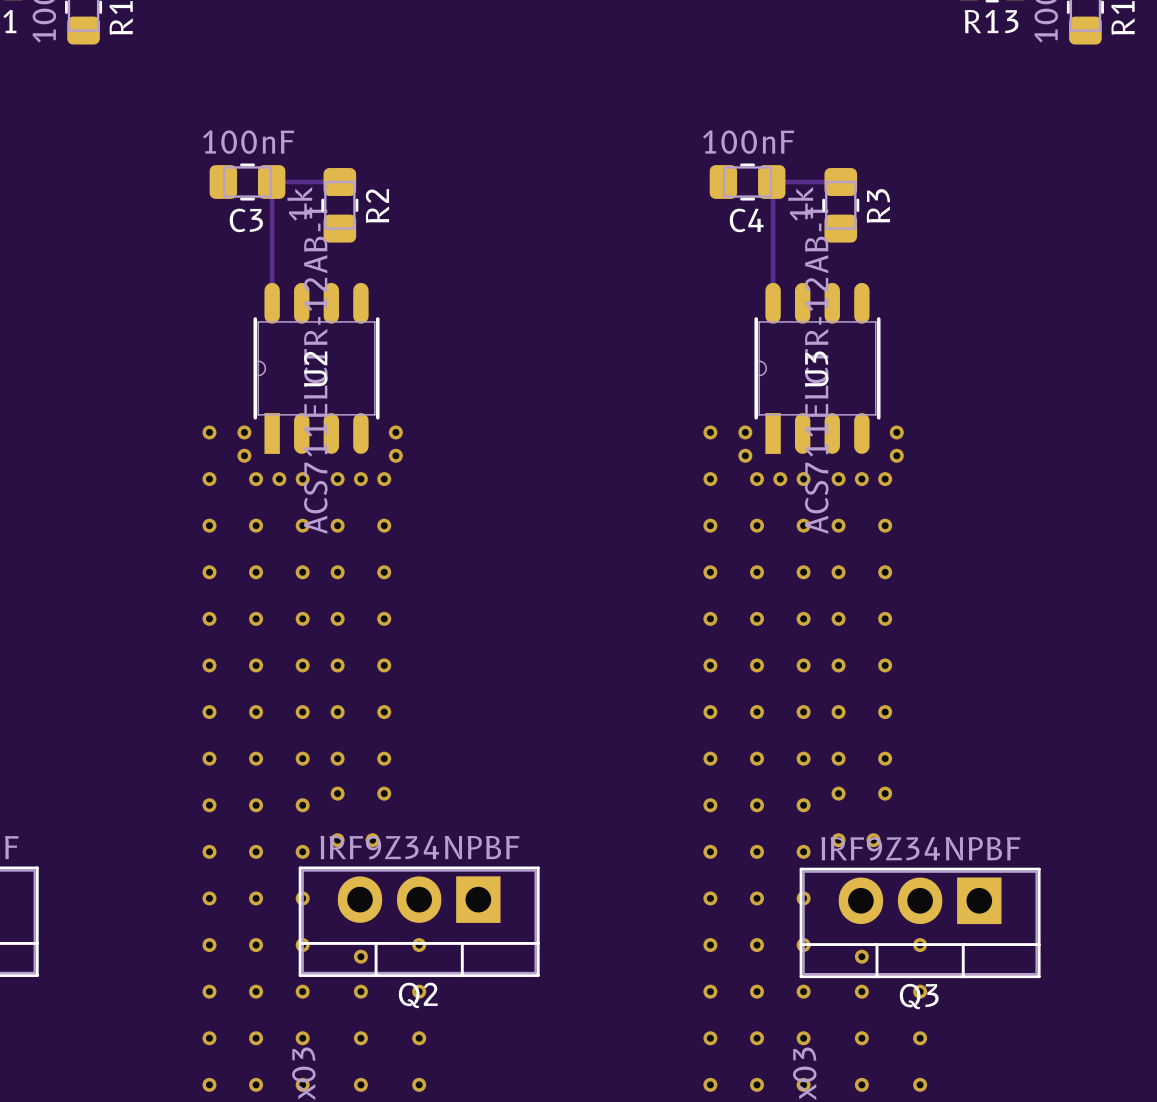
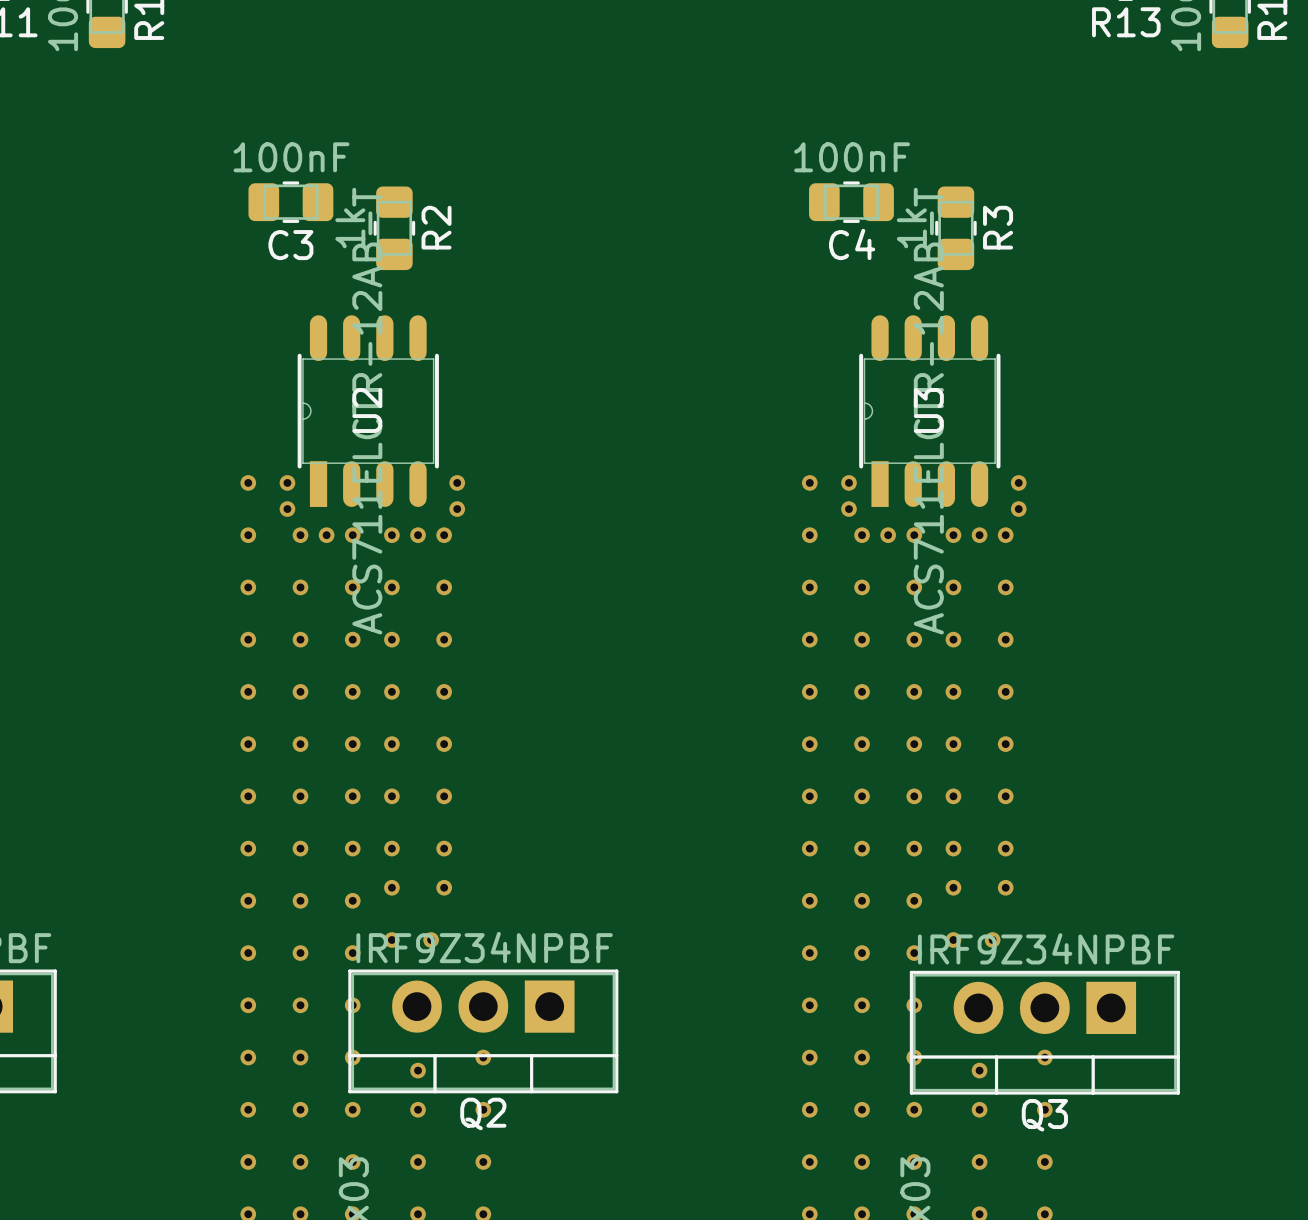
track: (339, 182) (271, 182) (272, 303) -> none
track: (840, 182) (771, 182) (773, 303) -> none

